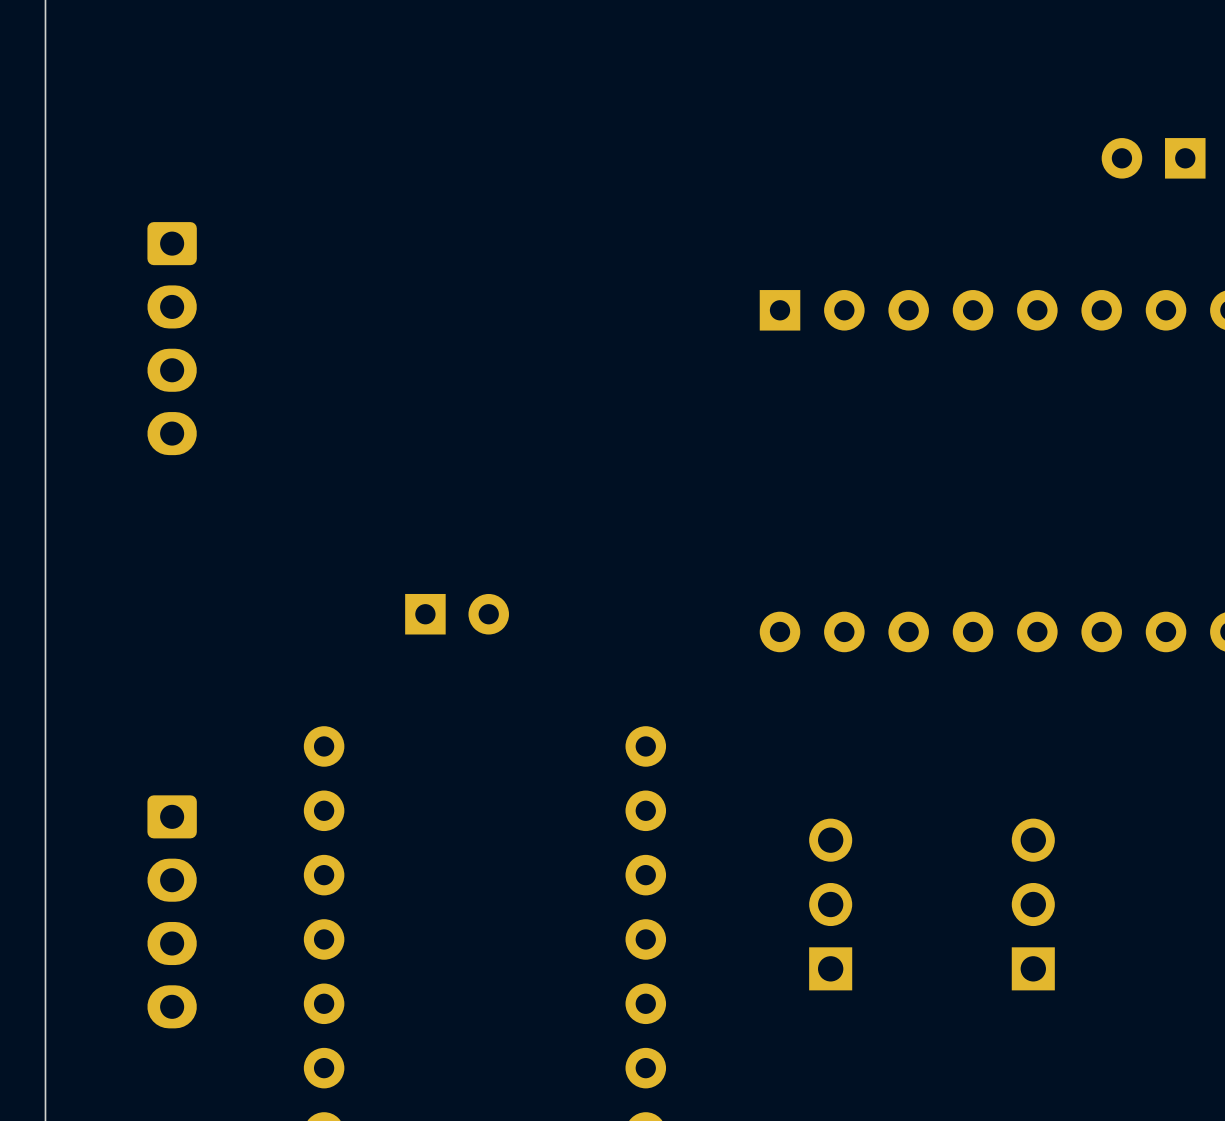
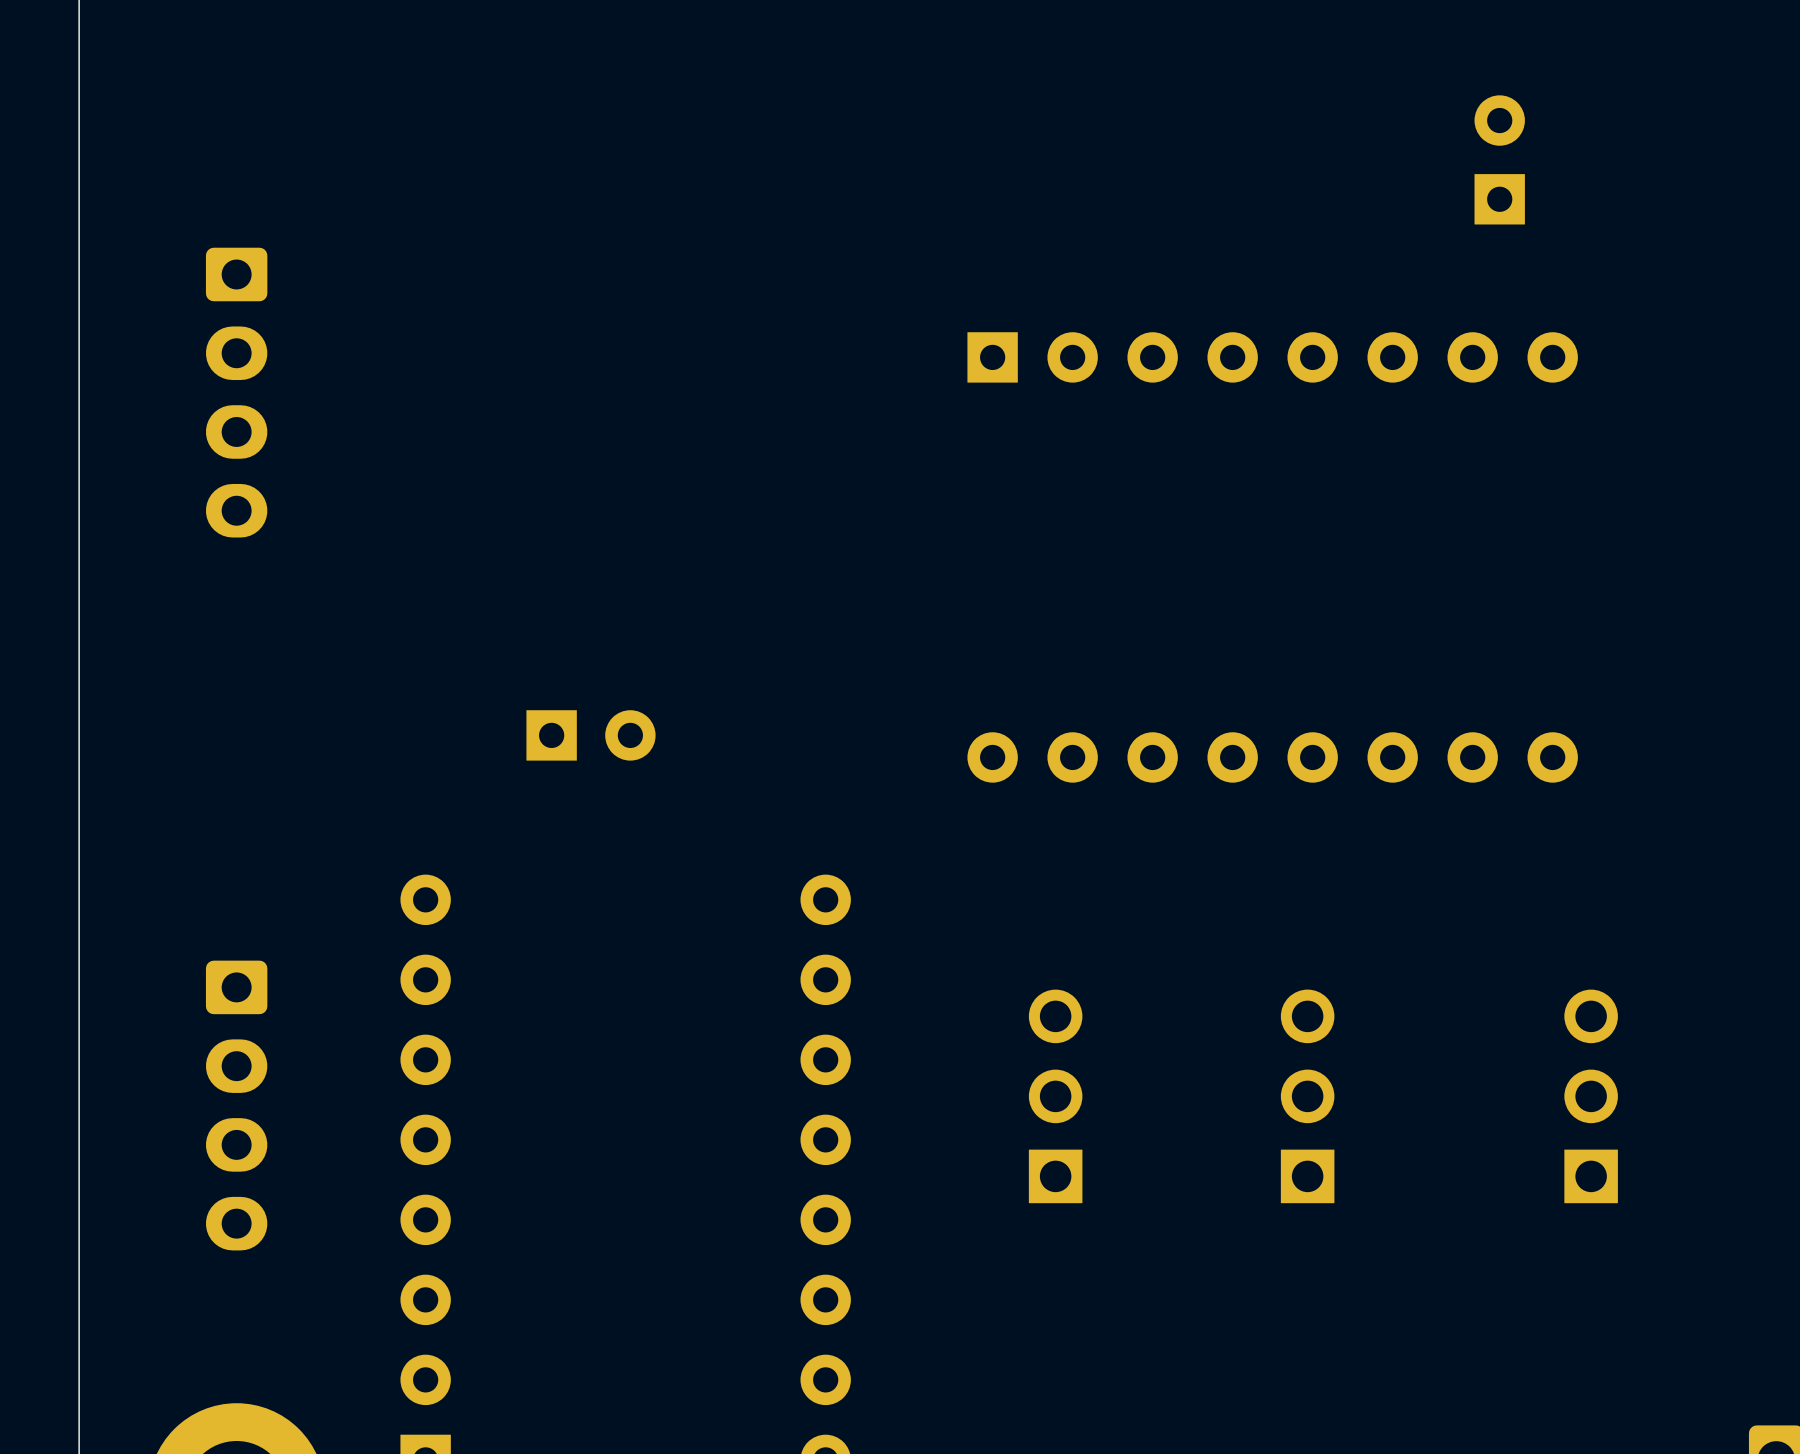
part rotation: 0° (1153, 158) -> 90° clockwise (1499, 159)

